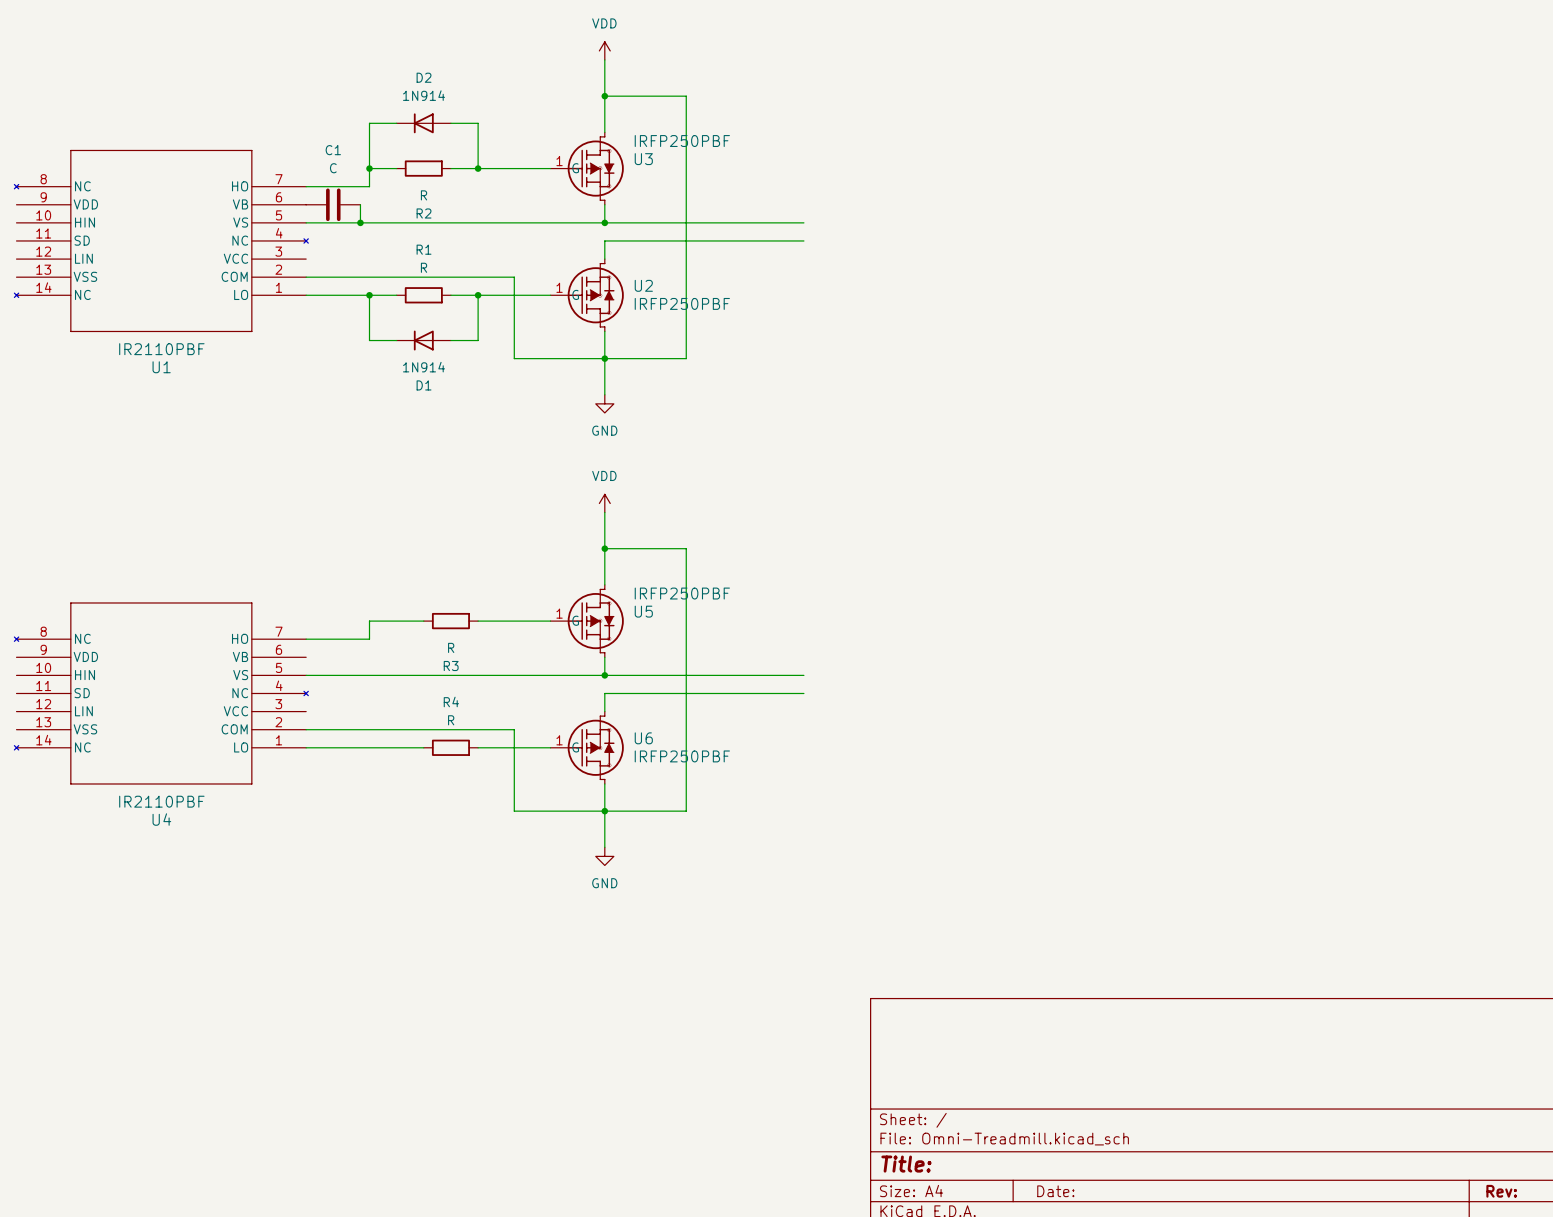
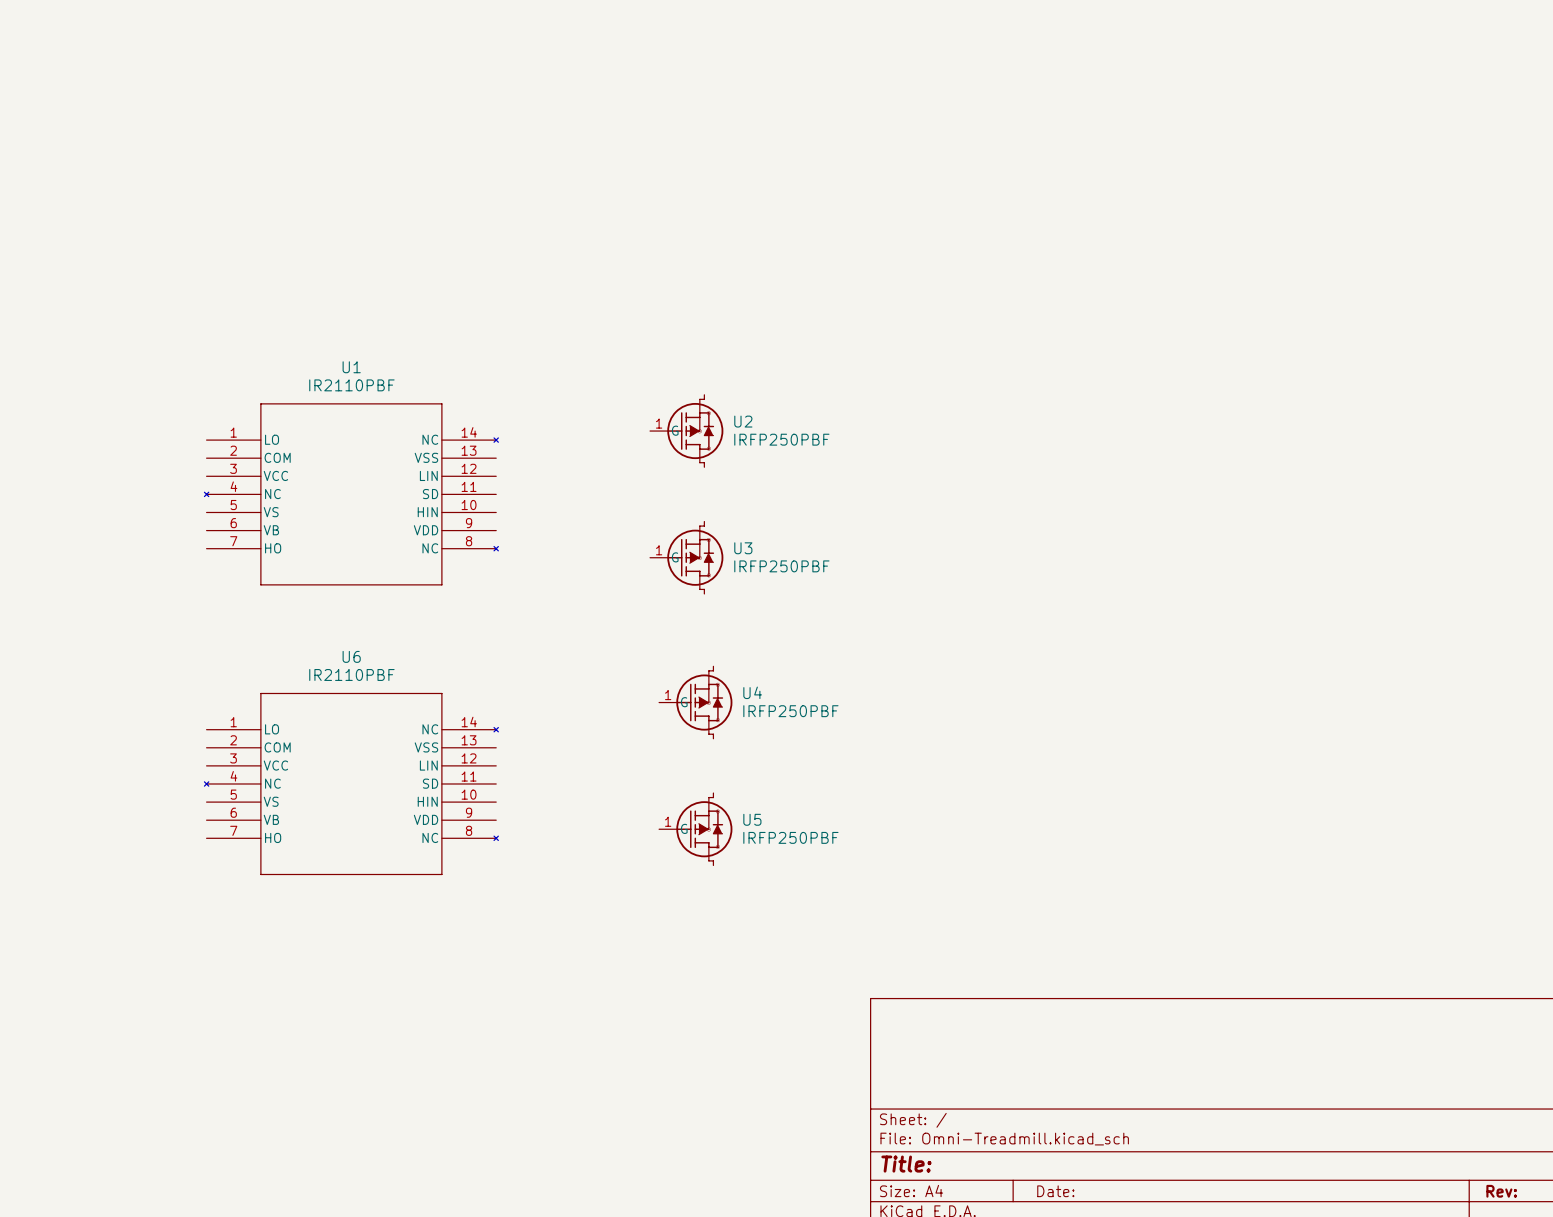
power symbol: VDD (604, 50) -> none
wire: (604, 59) (604, 132) -> none
wire: (604, 96) (686, 96) (686, 358) (514, 358) (514, 277) (306, 277) -> none
junction: (604, 96) -> none
wire: (396, 123) (369, 123) (369, 186) (306, 186) -> none
D2: 1N914 (423, 123) -> none
wire: (450, 123) (478, 123) (478, 168) -> none
U3 value position: IRFP250PBF (682, 141) -> IRFP250PBF (781, 566)
wire: (369, 168) (396, 168) -> none
junction: (369, 168) -> none
R2: R (423, 168) -> none
wire: (450, 168) (550, 168) -> none
junction: (478, 168) -> none
U3 position: (587, 168) -> (686, 557)
U3 flip: as is (595, 168) -> up-down (695, 557)
C1: C (333, 204) -> none
wire: (360, 204) (360, 222) -> none
wire: (604, 204) (604, 222) -> none
wire: (306, 222) (803, 222) -> none
junction: (360, 222) -> none
junction: (604, 222) -> none
U1 rotation: 0° (161, 240) -> 180° (351, 494)
U1 position: (161, 240) -> (351, 494)
wire: (803, 240) (604, 240) (604, 259) -> none
wire: (306, 295) (396, 295) -> none
wire: (369, 295) (369, 340) (396, 340) -> none
junction: (369, 295) -> none
R1: R (423, 295) -> none
wire: (450, 295) (550, 295) -> none
wire: (478, 295) (478, 340) (450, 340) -> none
junction: (478, 295) -> none
U2 position: (587, 295) -> (686, 431)
wire: (604, 331) (604, 394) -> none
D1: 1N914 (423, 340) -> none
junction: (604, 358) -> none
power symbol: GND (604, 403) -> none
power symbol: VDD (604, 503) -> none
wire: (604, 512) (604, 584) -> none
wire: (604, 548) (686, 548) (686, 811) (514, 811) (514, 729) (306, 729) -> none
junction: (604, 548) -> none
U5 value position: IRFP250PBF (682, 593) -> IRFP250PBF (790, 837)
U4 symbol: [14, 602, 309, 785] -> [659, 665, 733, 740]
wire: (423, 621) (369, 621) (369, 639) (306, 639) -> none
R3: R (450, 621) -> none
wire: (478, 621) (550, 621) -> none
U5 position: (587, 621) -> (695, 829)
U5 flip: as is (595, 621) -> up-down (704, 829)
wire: (604, 657) (604, 675) -> none
wire: (306, 675) (803, 675) -> none
junction: (604, 675) -> none
wire: (803, 693) (604, 693) (604, 711) -> none
U6 symbol: [550, 711, 624, 785] -> [204, 693, 499, 875]
U6 name position: U6 (643, 738) -> U6 (351, 656)
wire: (306, 747) (423, 747) -> none
R4: R (450, 747) -> none
wire: (478, 747) (550, 747) -> none
U6 value: IRFP250PBF (682, 756) -> IR2110PBF (351, 674)
wire: (604, 783) (604, 847) -> none
U4 value: IR2110PBF (161, 801) -> IRFP250PBF (790, 711)
junction: (604, 811) -> none
U4 name position: U4 (161, 819) -> U4 (752, 692)
power symbol: GND (604, 856) -> none

